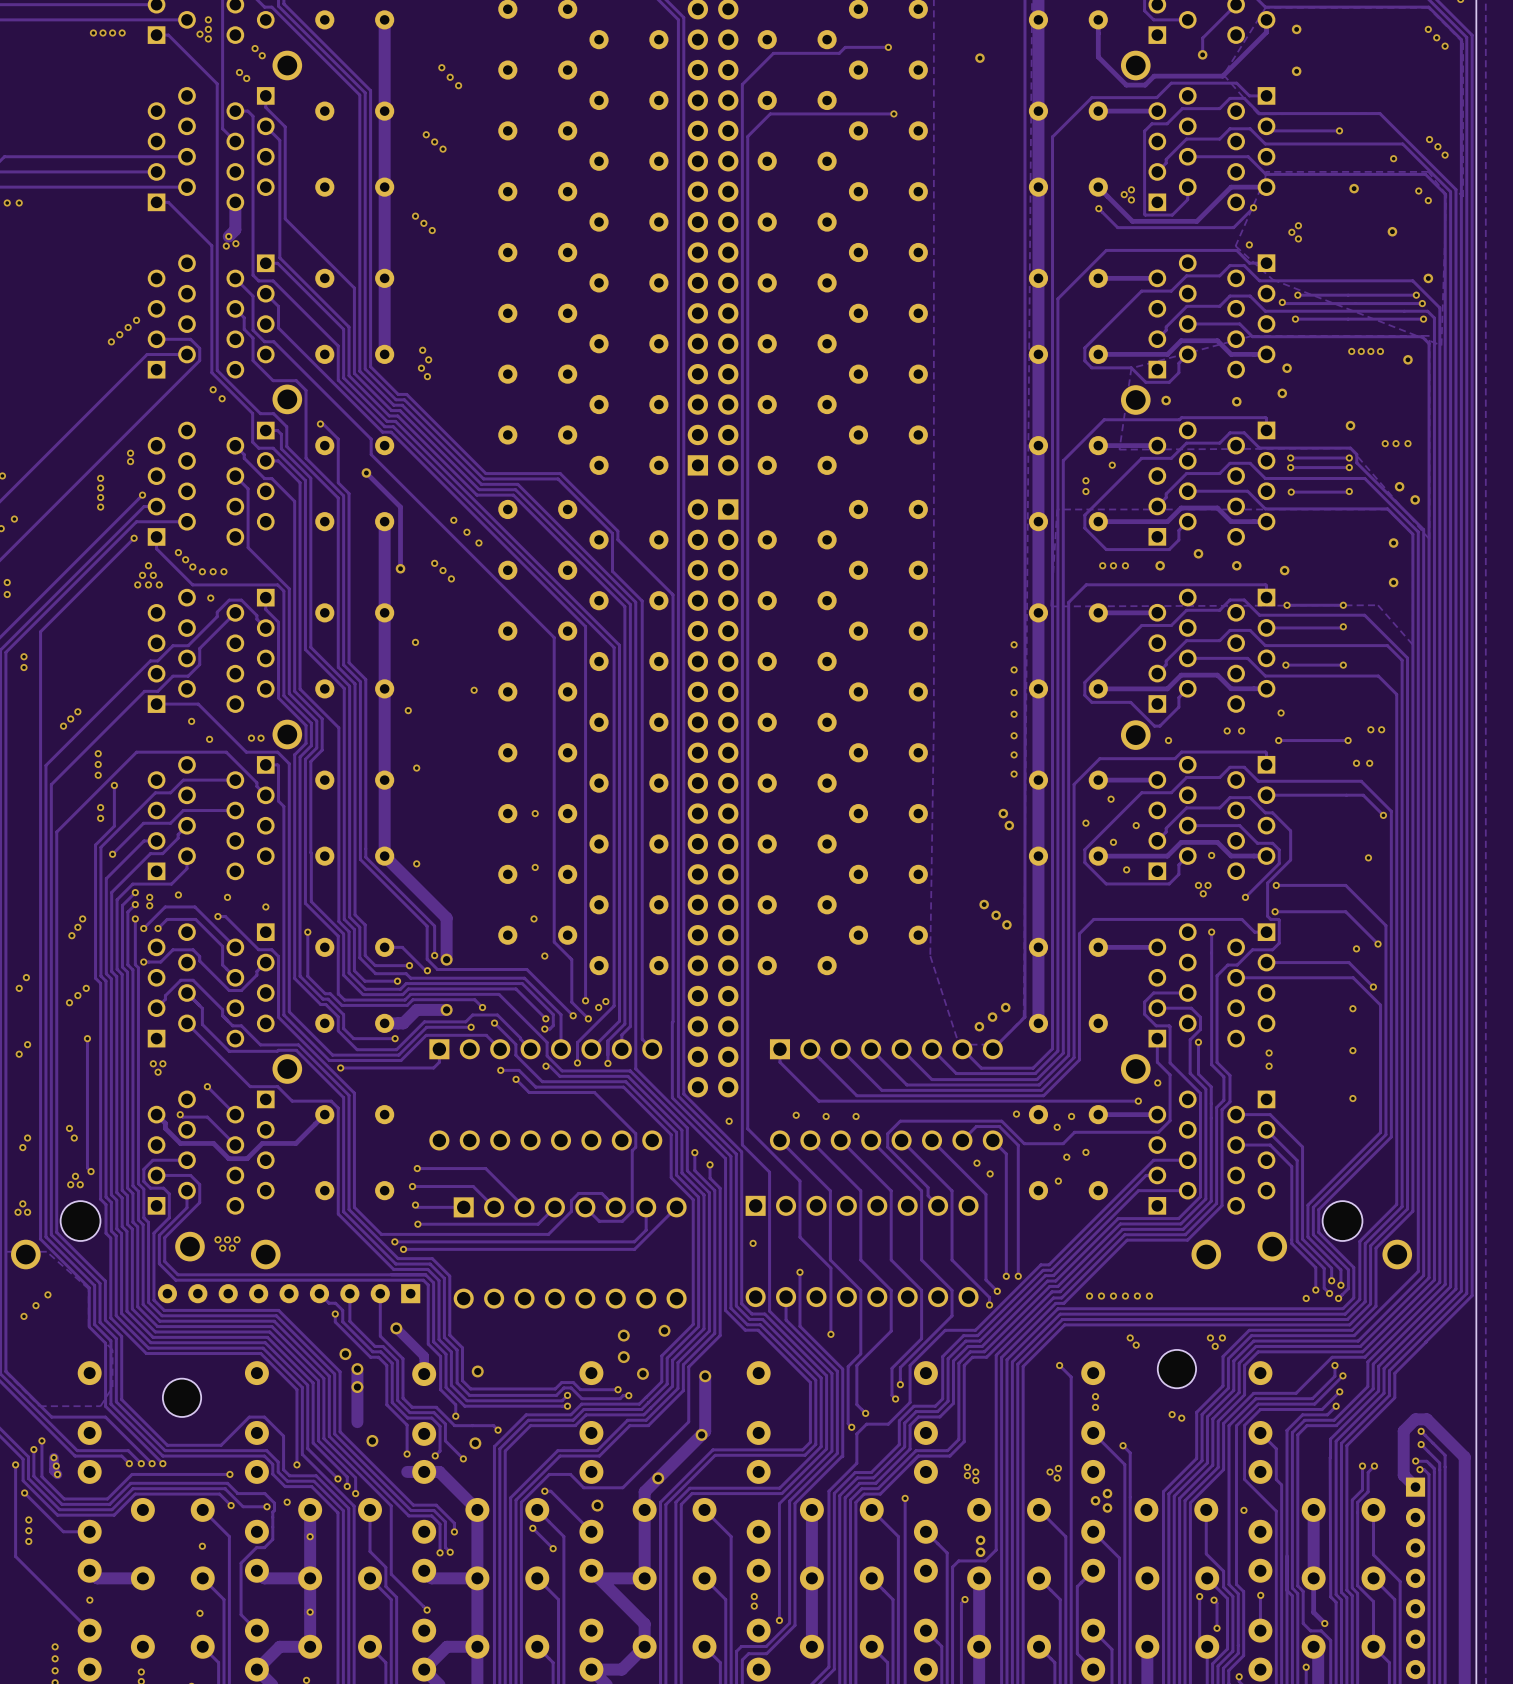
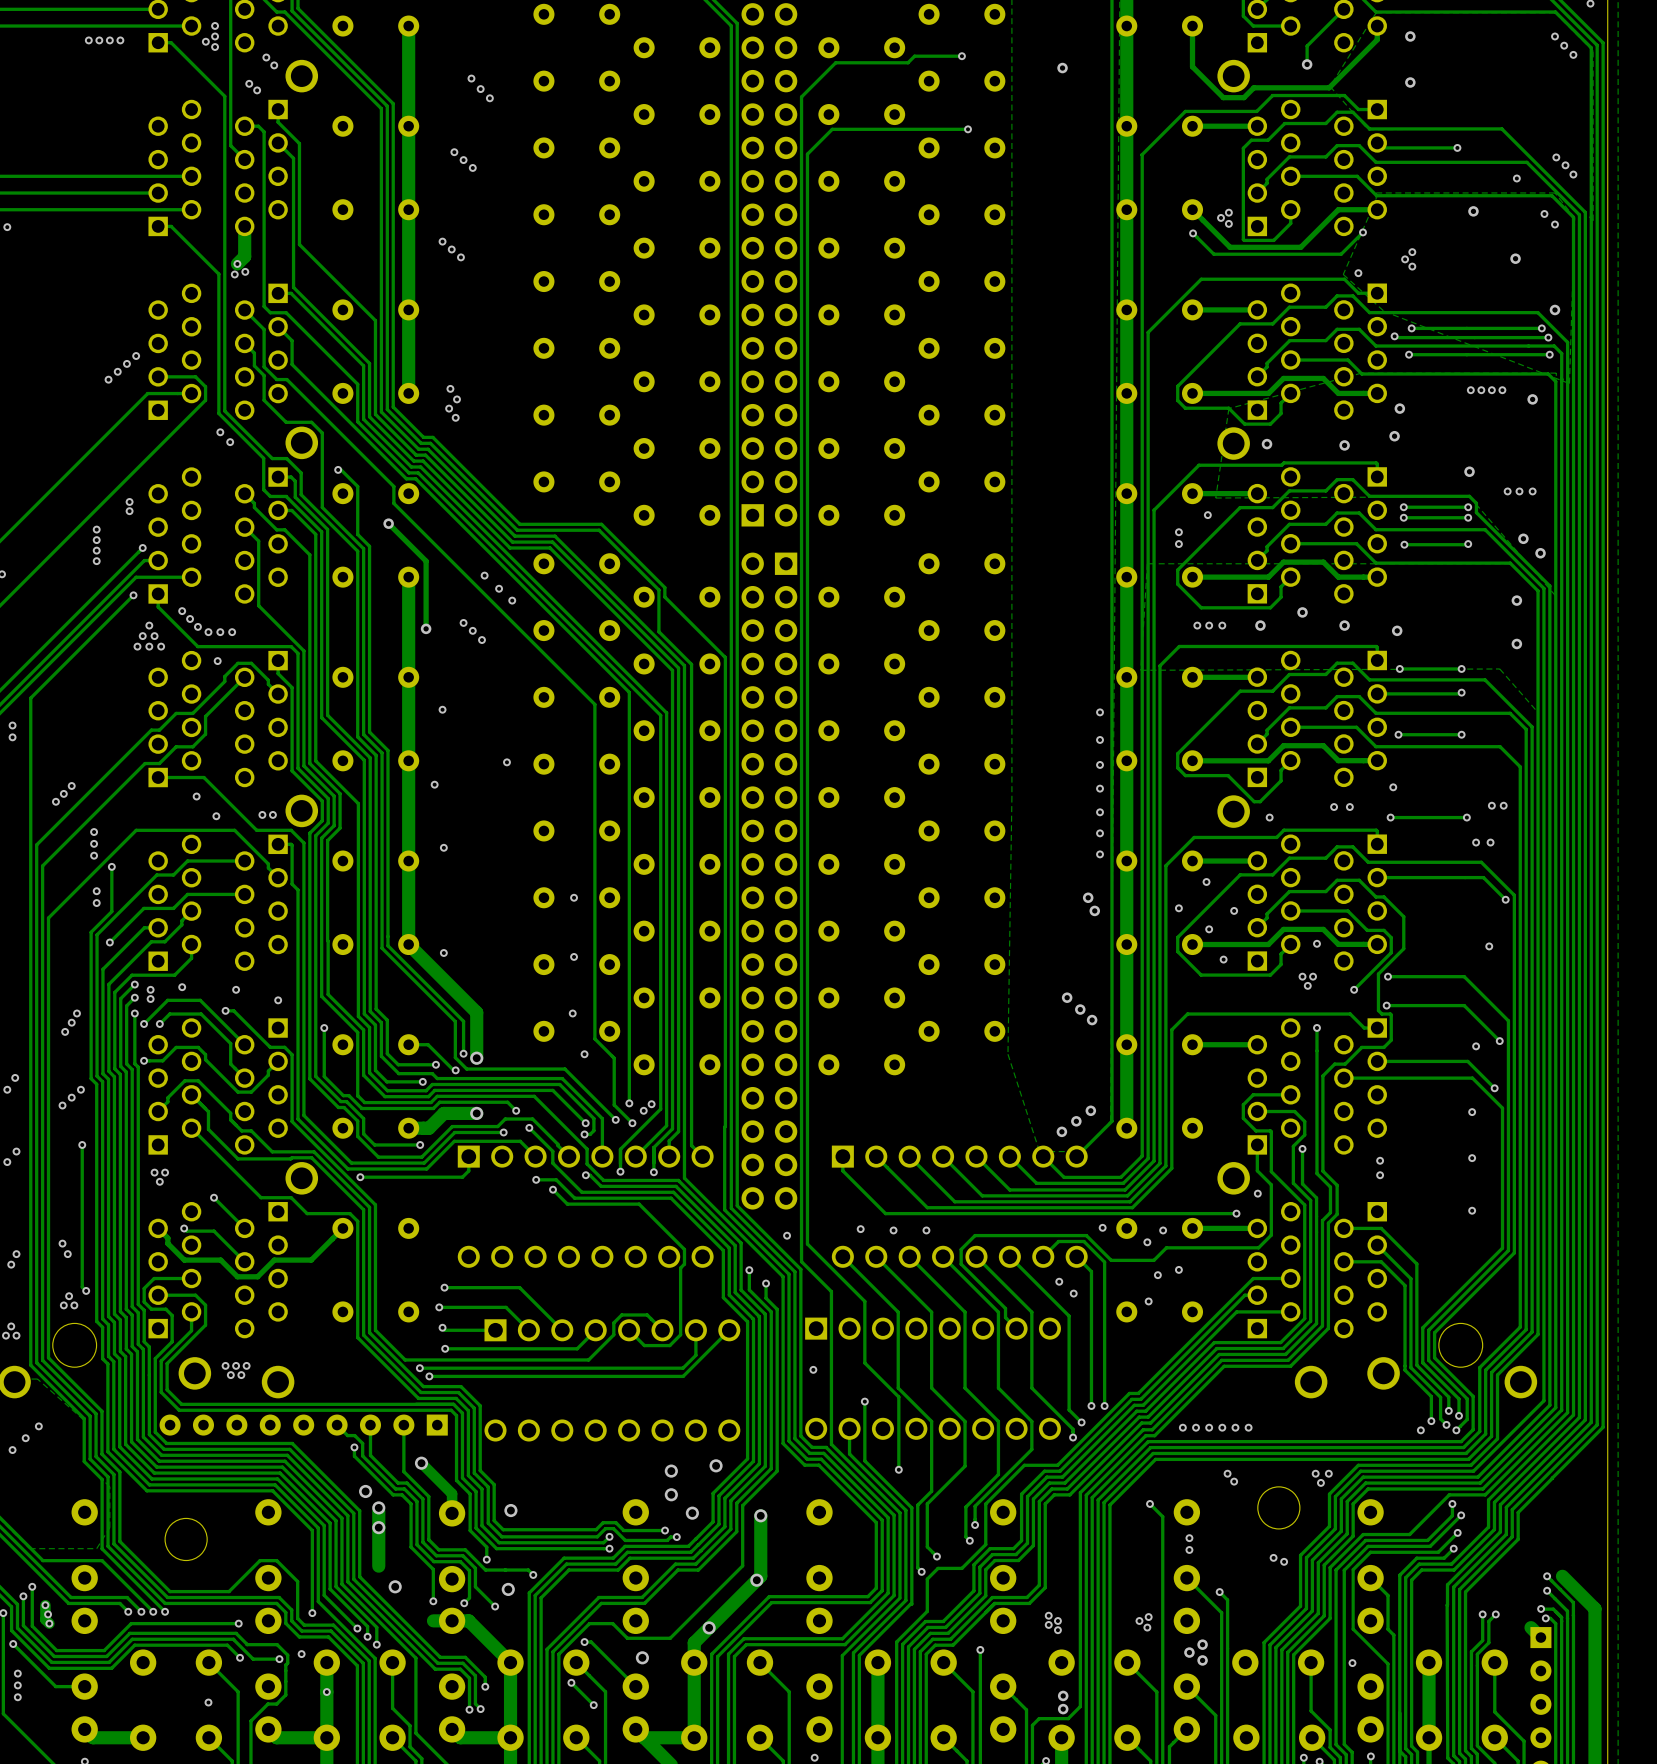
track: (1464, 1460) (1464, 1457) (1426, 1419) (1415, 1419) (1403, 1431) (1403, 1475) (1406, 1478) -> (1594, 1608) (1562, 1576)

